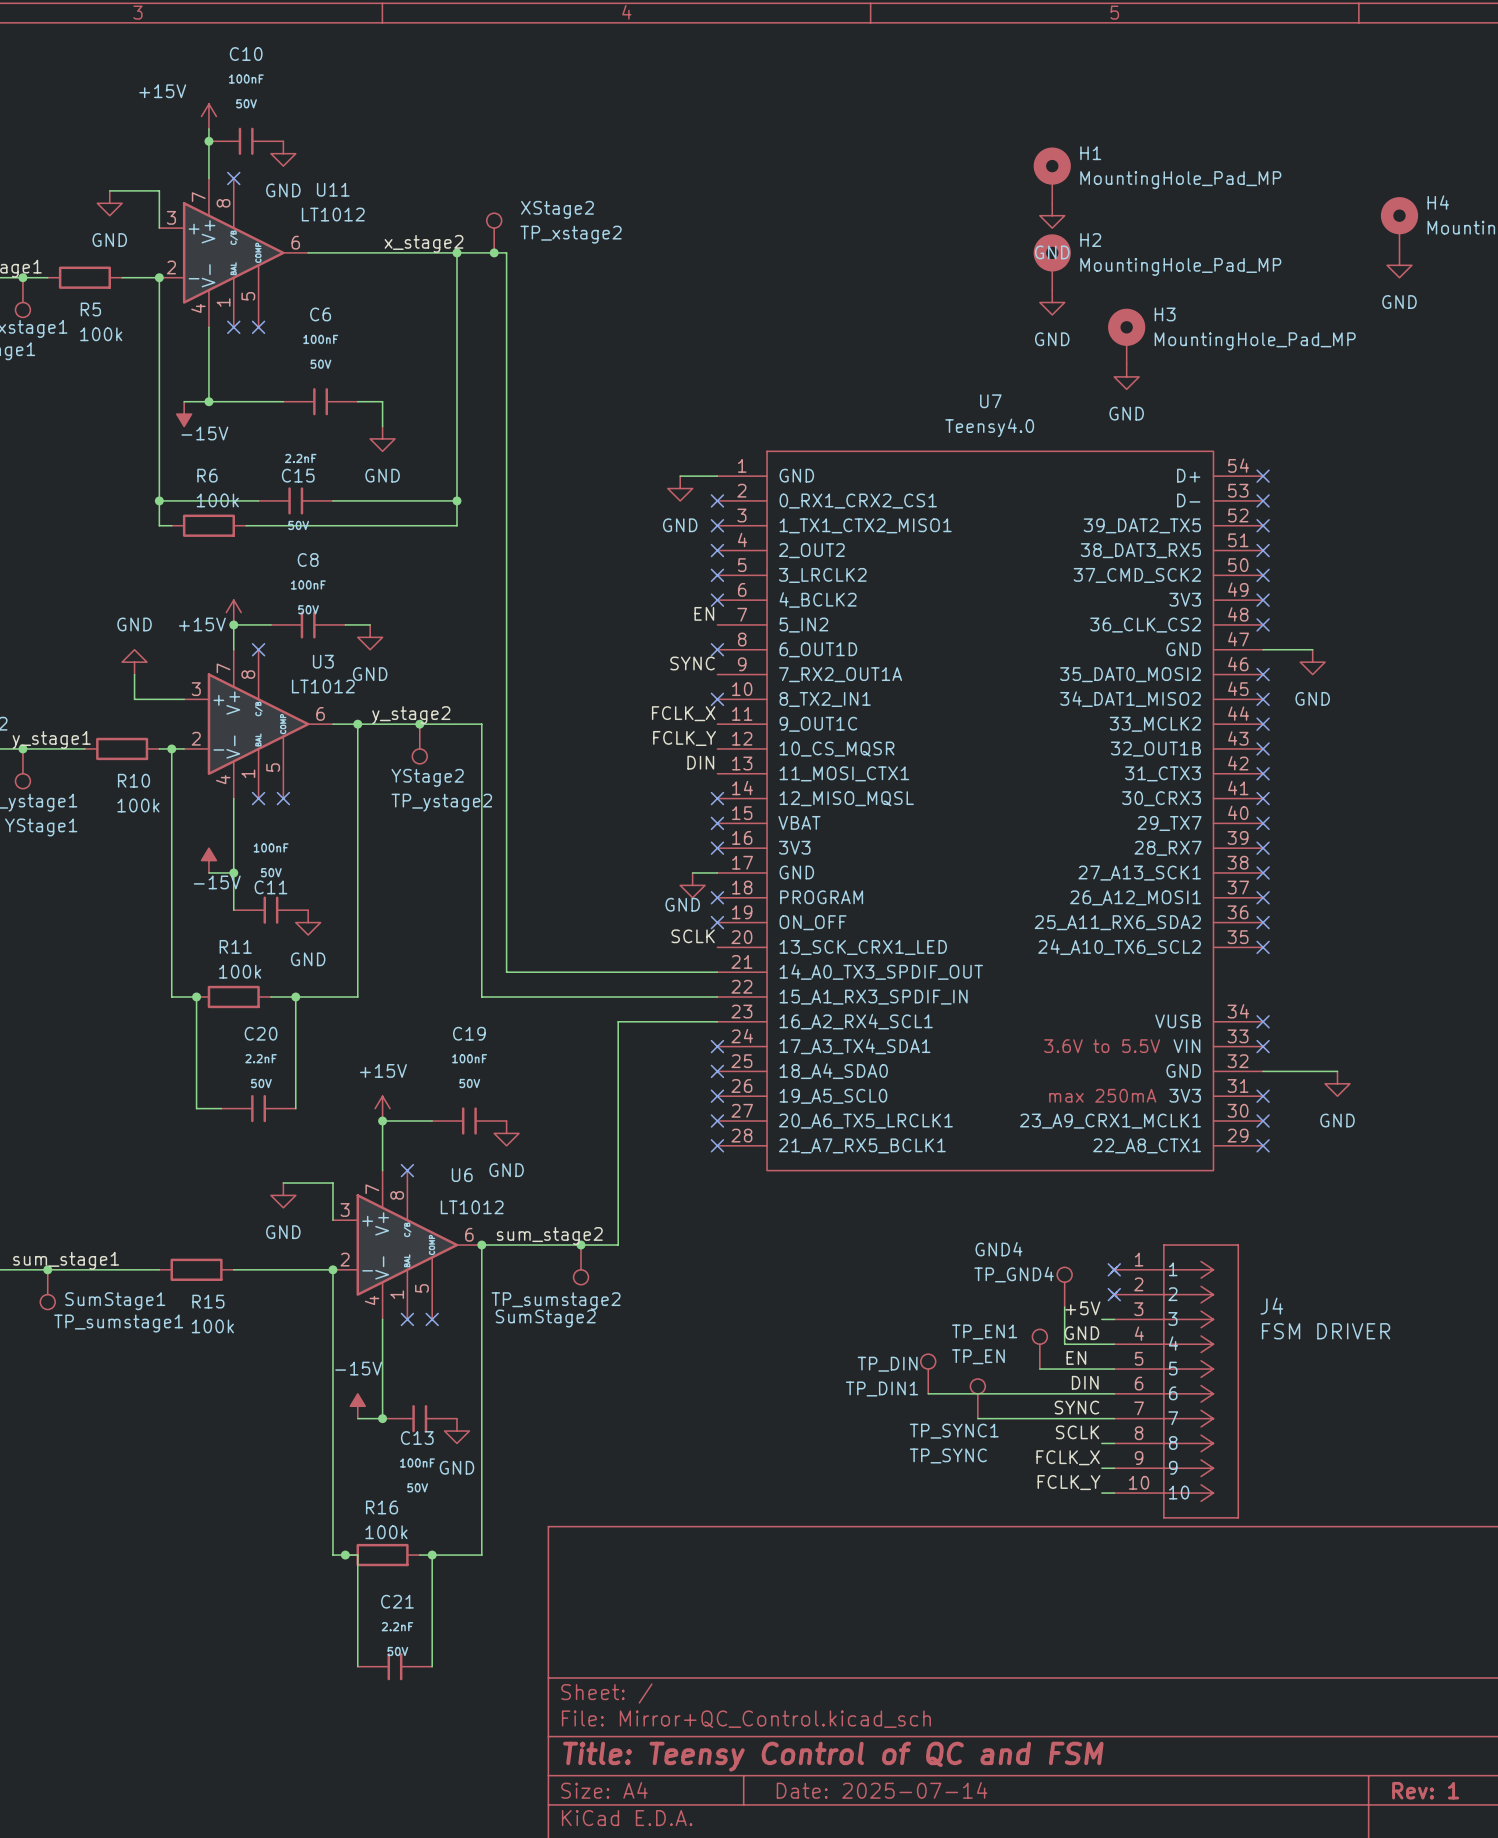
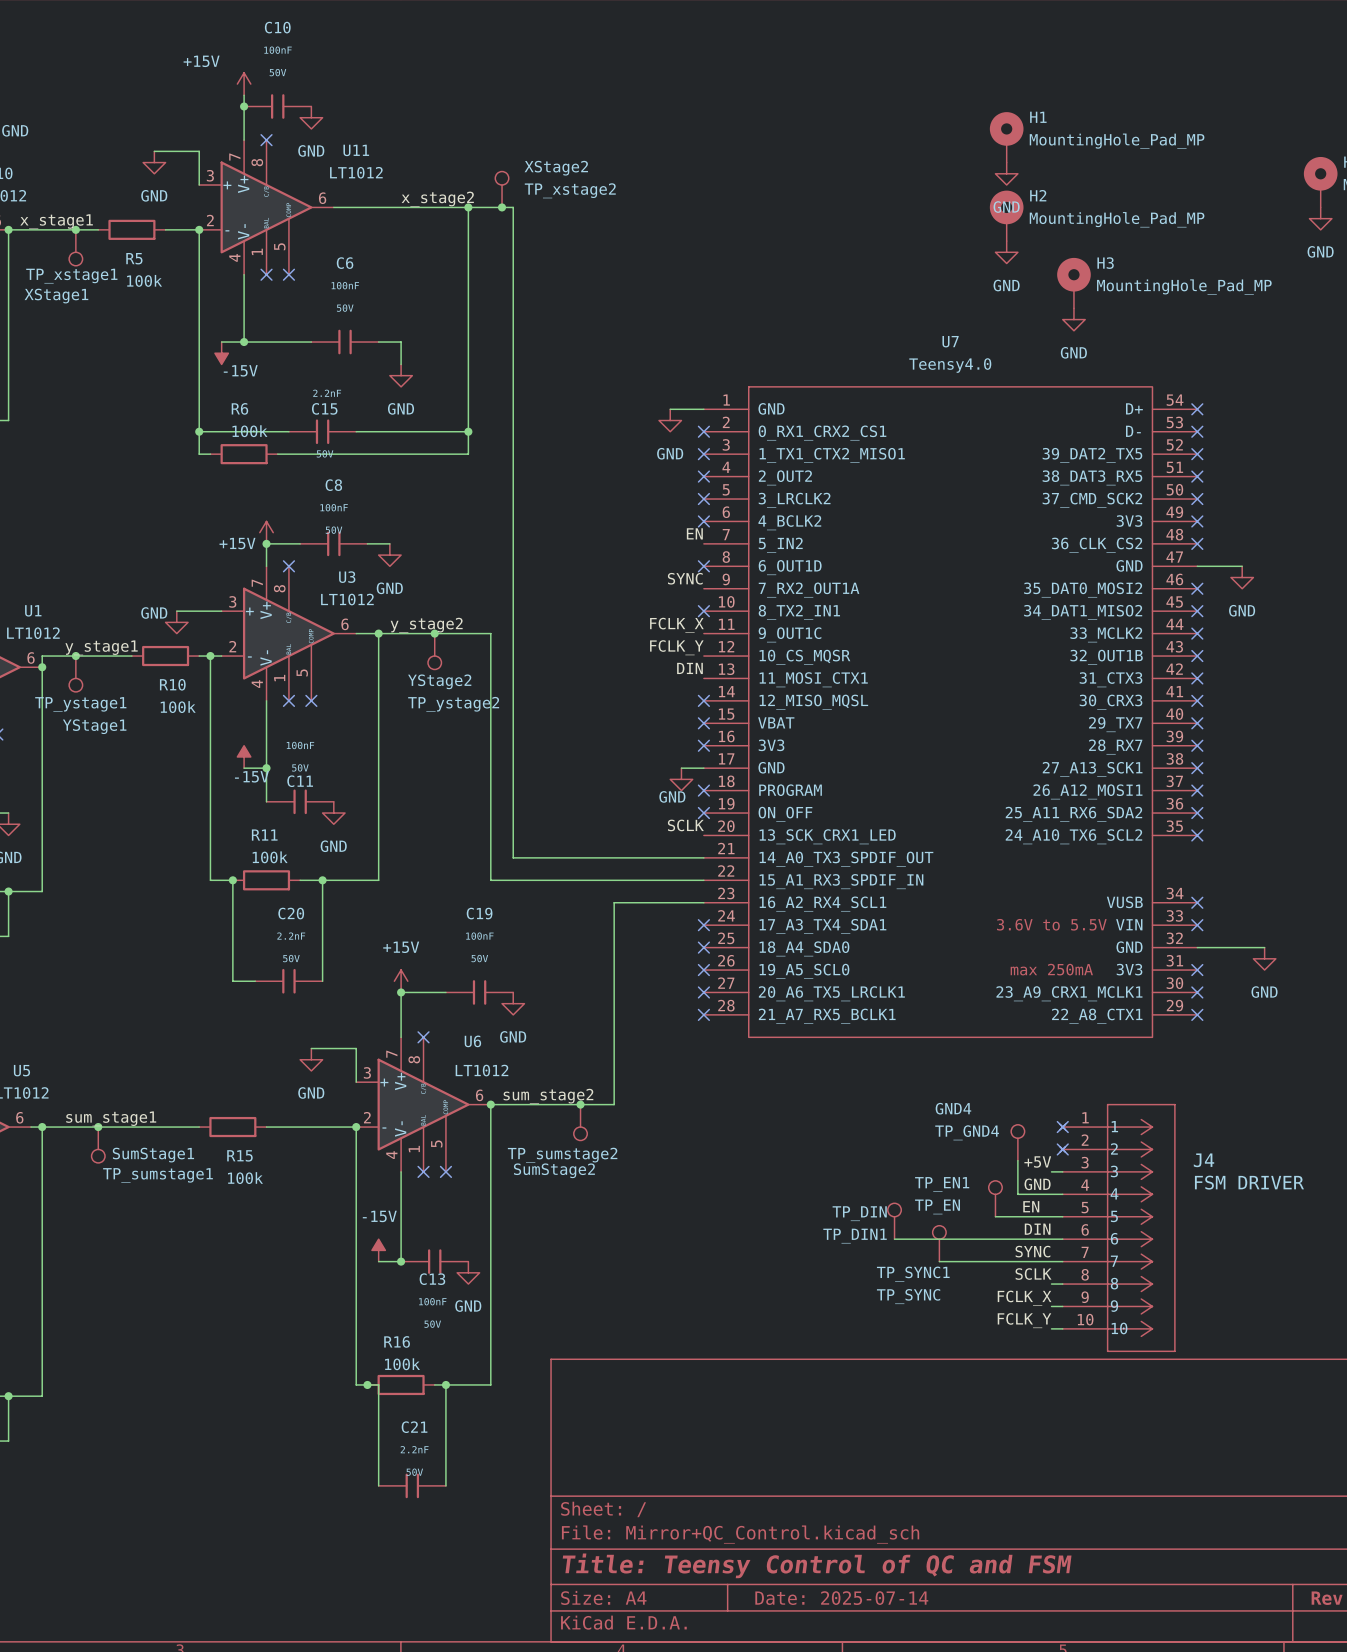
power symbol text position: GND (134, 624) -> GND (154, 612)
power symbol rotation: 0° (134, 662) -> 180° (176, 622)
power symbol position: GND (134, 662) -> GND (176, 622)
wire: (134, 674) (134, 699) -> none

